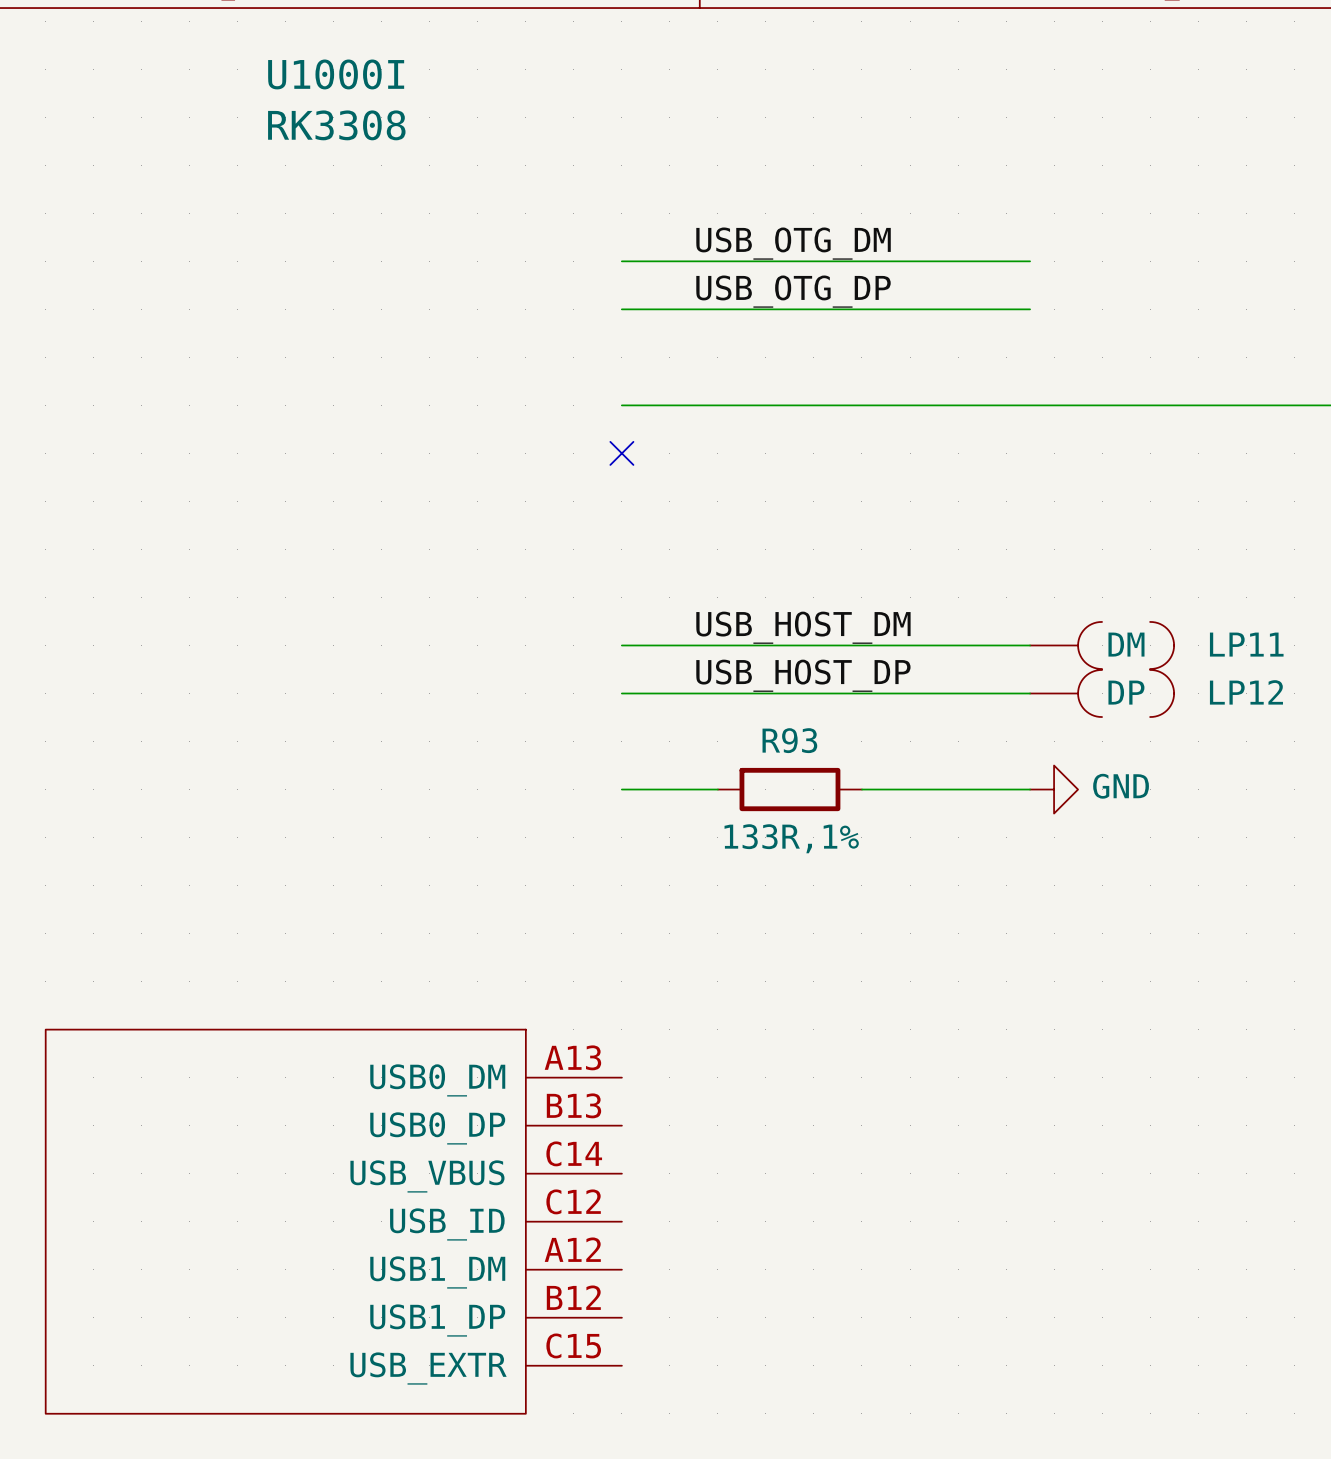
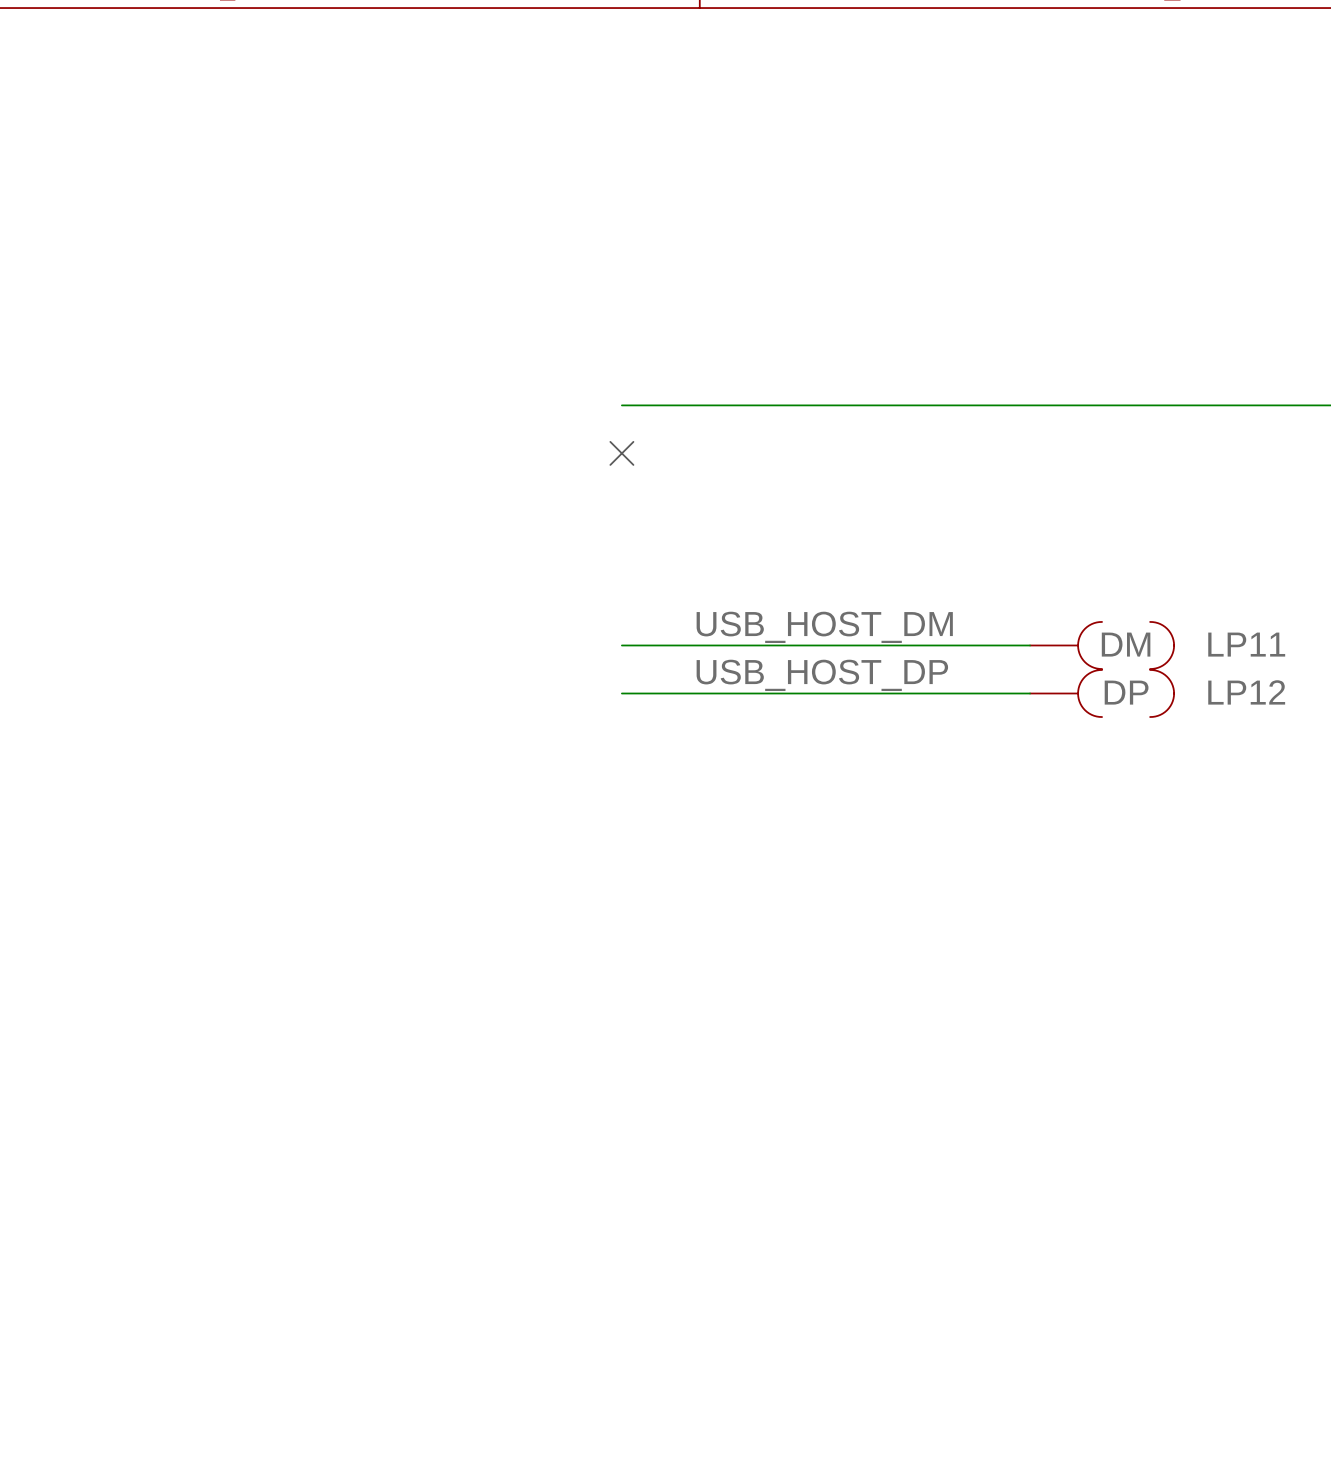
label: USB_OTG_DM (793, 243) -> none
wire: (621, 261) (1030, 261) -> none
label: USB_OTG_DP (793, 291) -> none
wire: (621, 309) (1030, 309) -> none
wire: (621, 789) (717, 789) -> none
R93: 133R,1% (789, 789) -> none
wire: (861, 789) (1030, 789) -> none
power symbol: GND (1054, 789) -> none
U1000I: RK3308 (333, 1221) -> none

